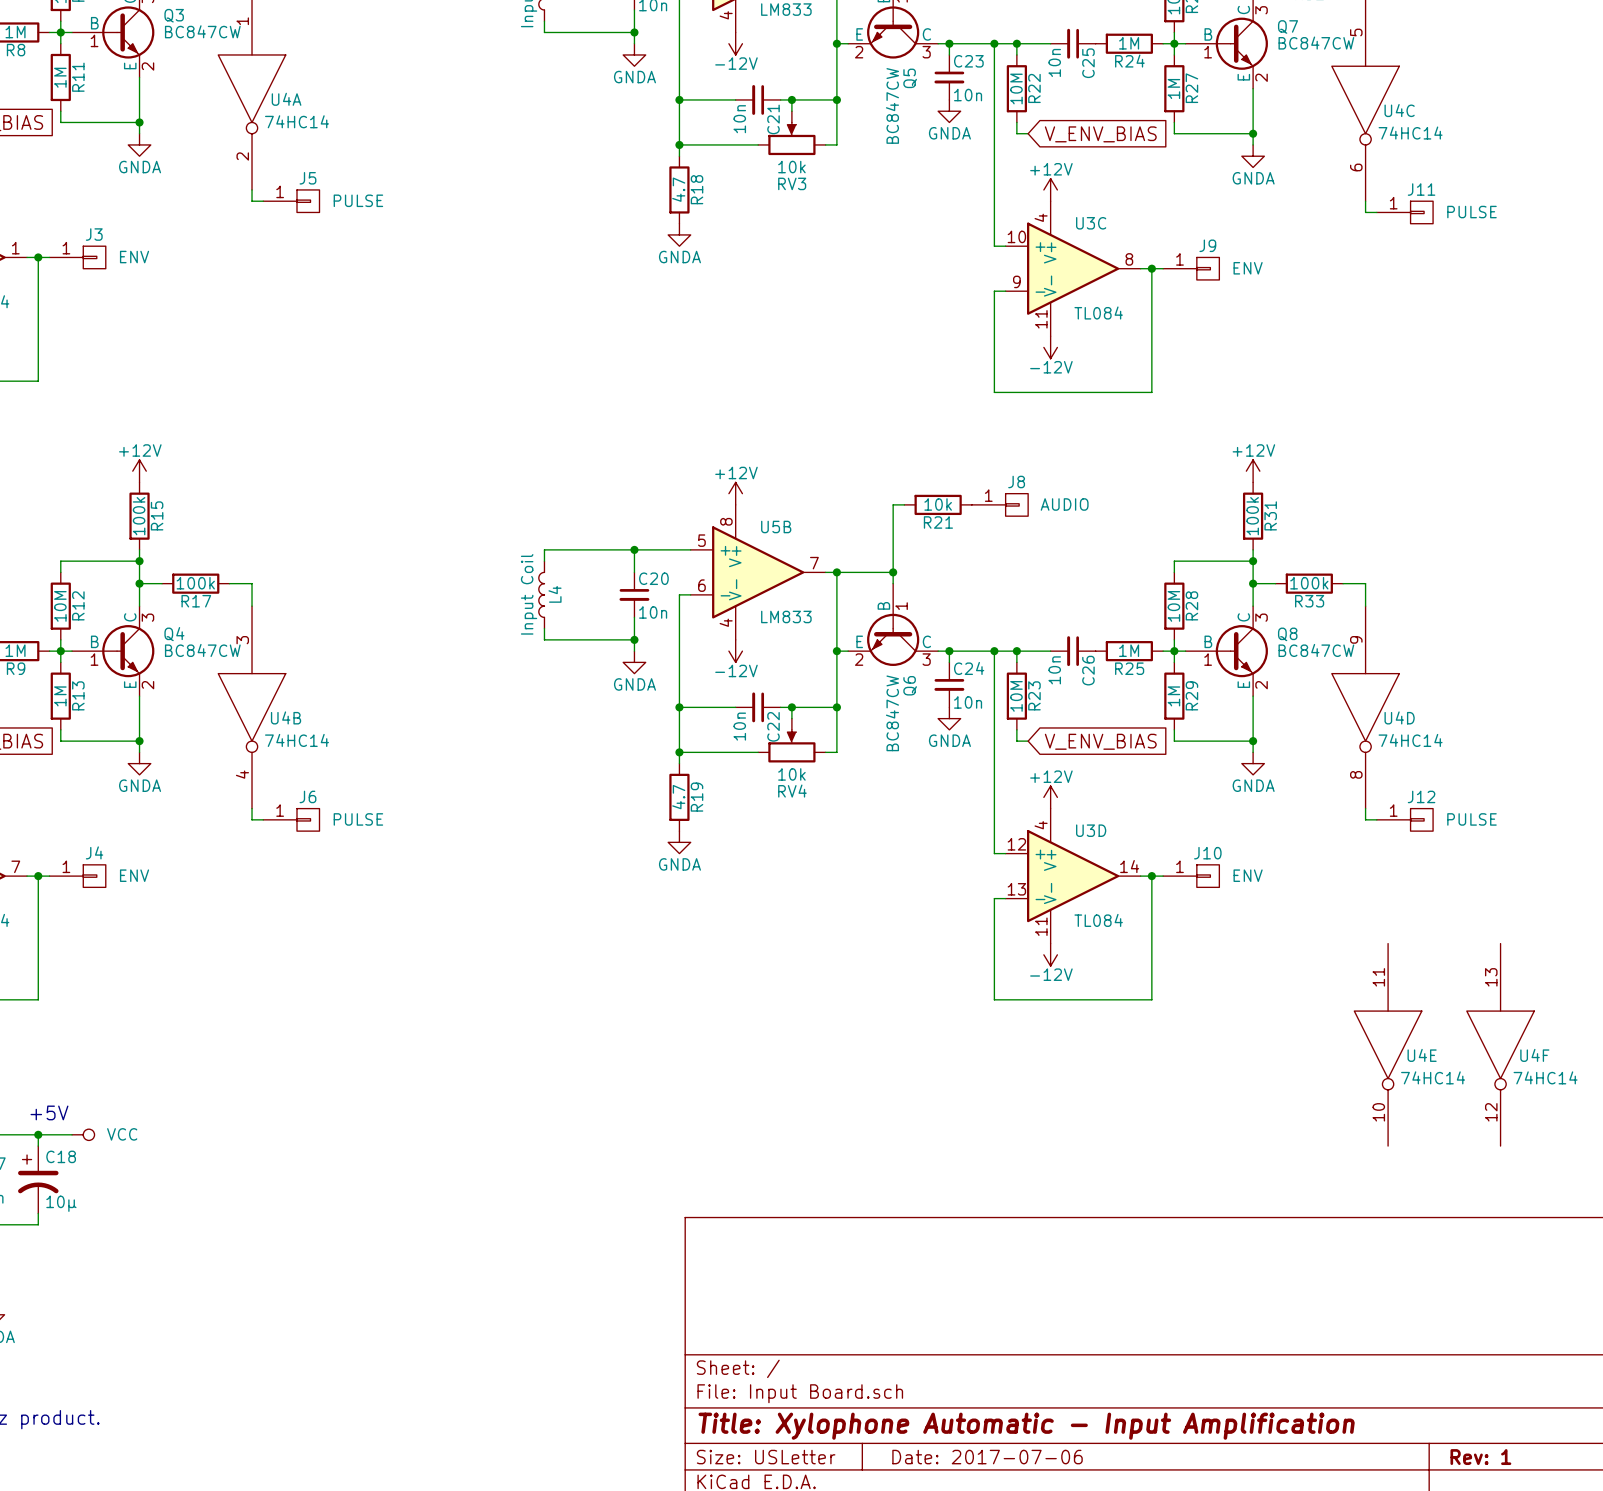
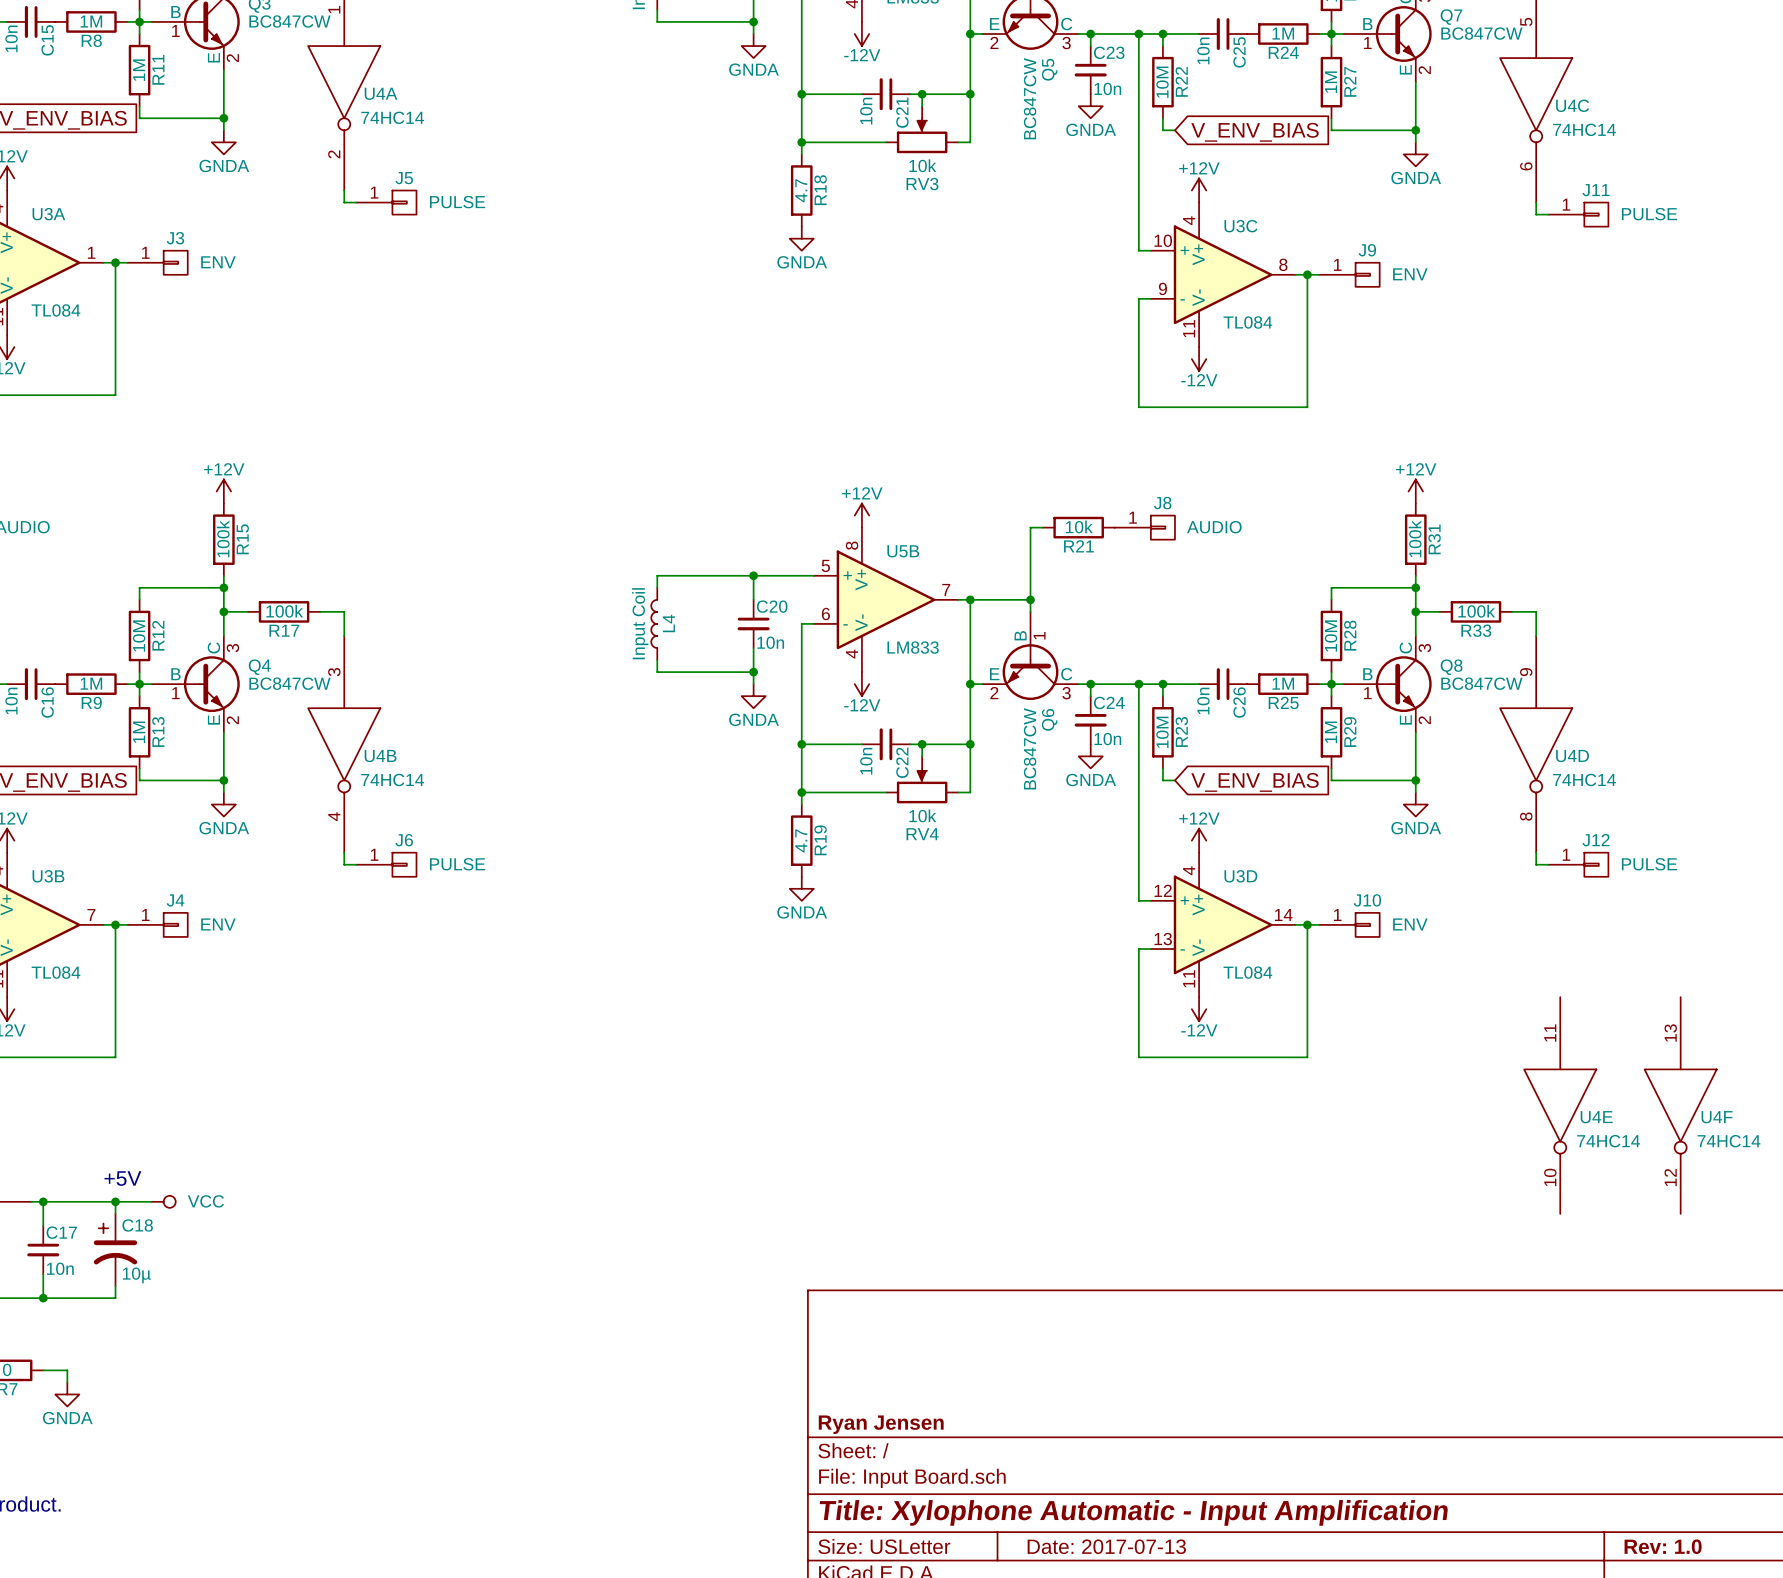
title block: none -> Ryan Jensen (881, 1424)
title block: Date: 2017-07-06 (987, 1457) -> Date: 2017-07-13 (1106, 1546)
title block: Rev: 1 (1480, 1457) -> Rev: 1.0 (1663, 1546)

